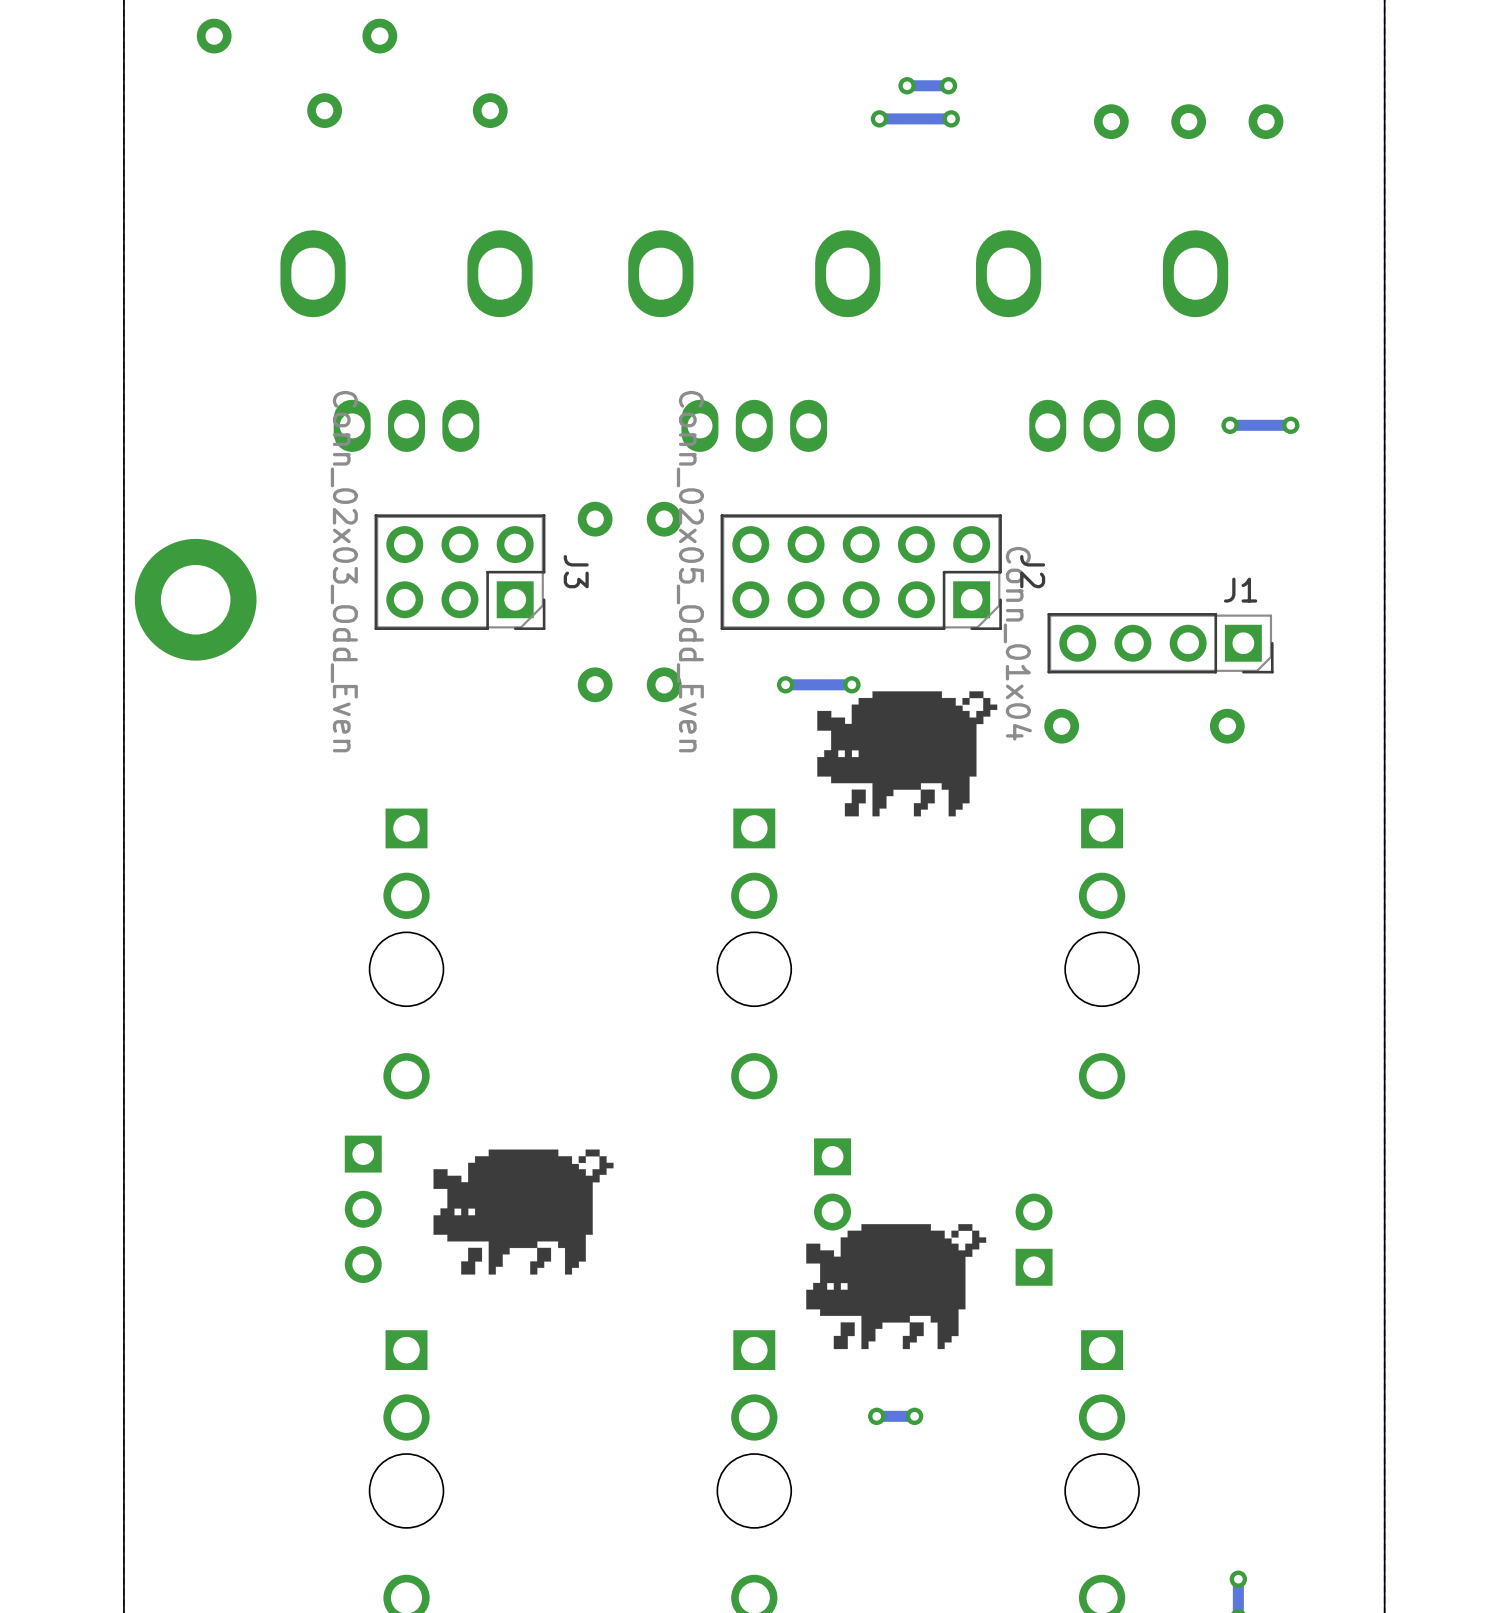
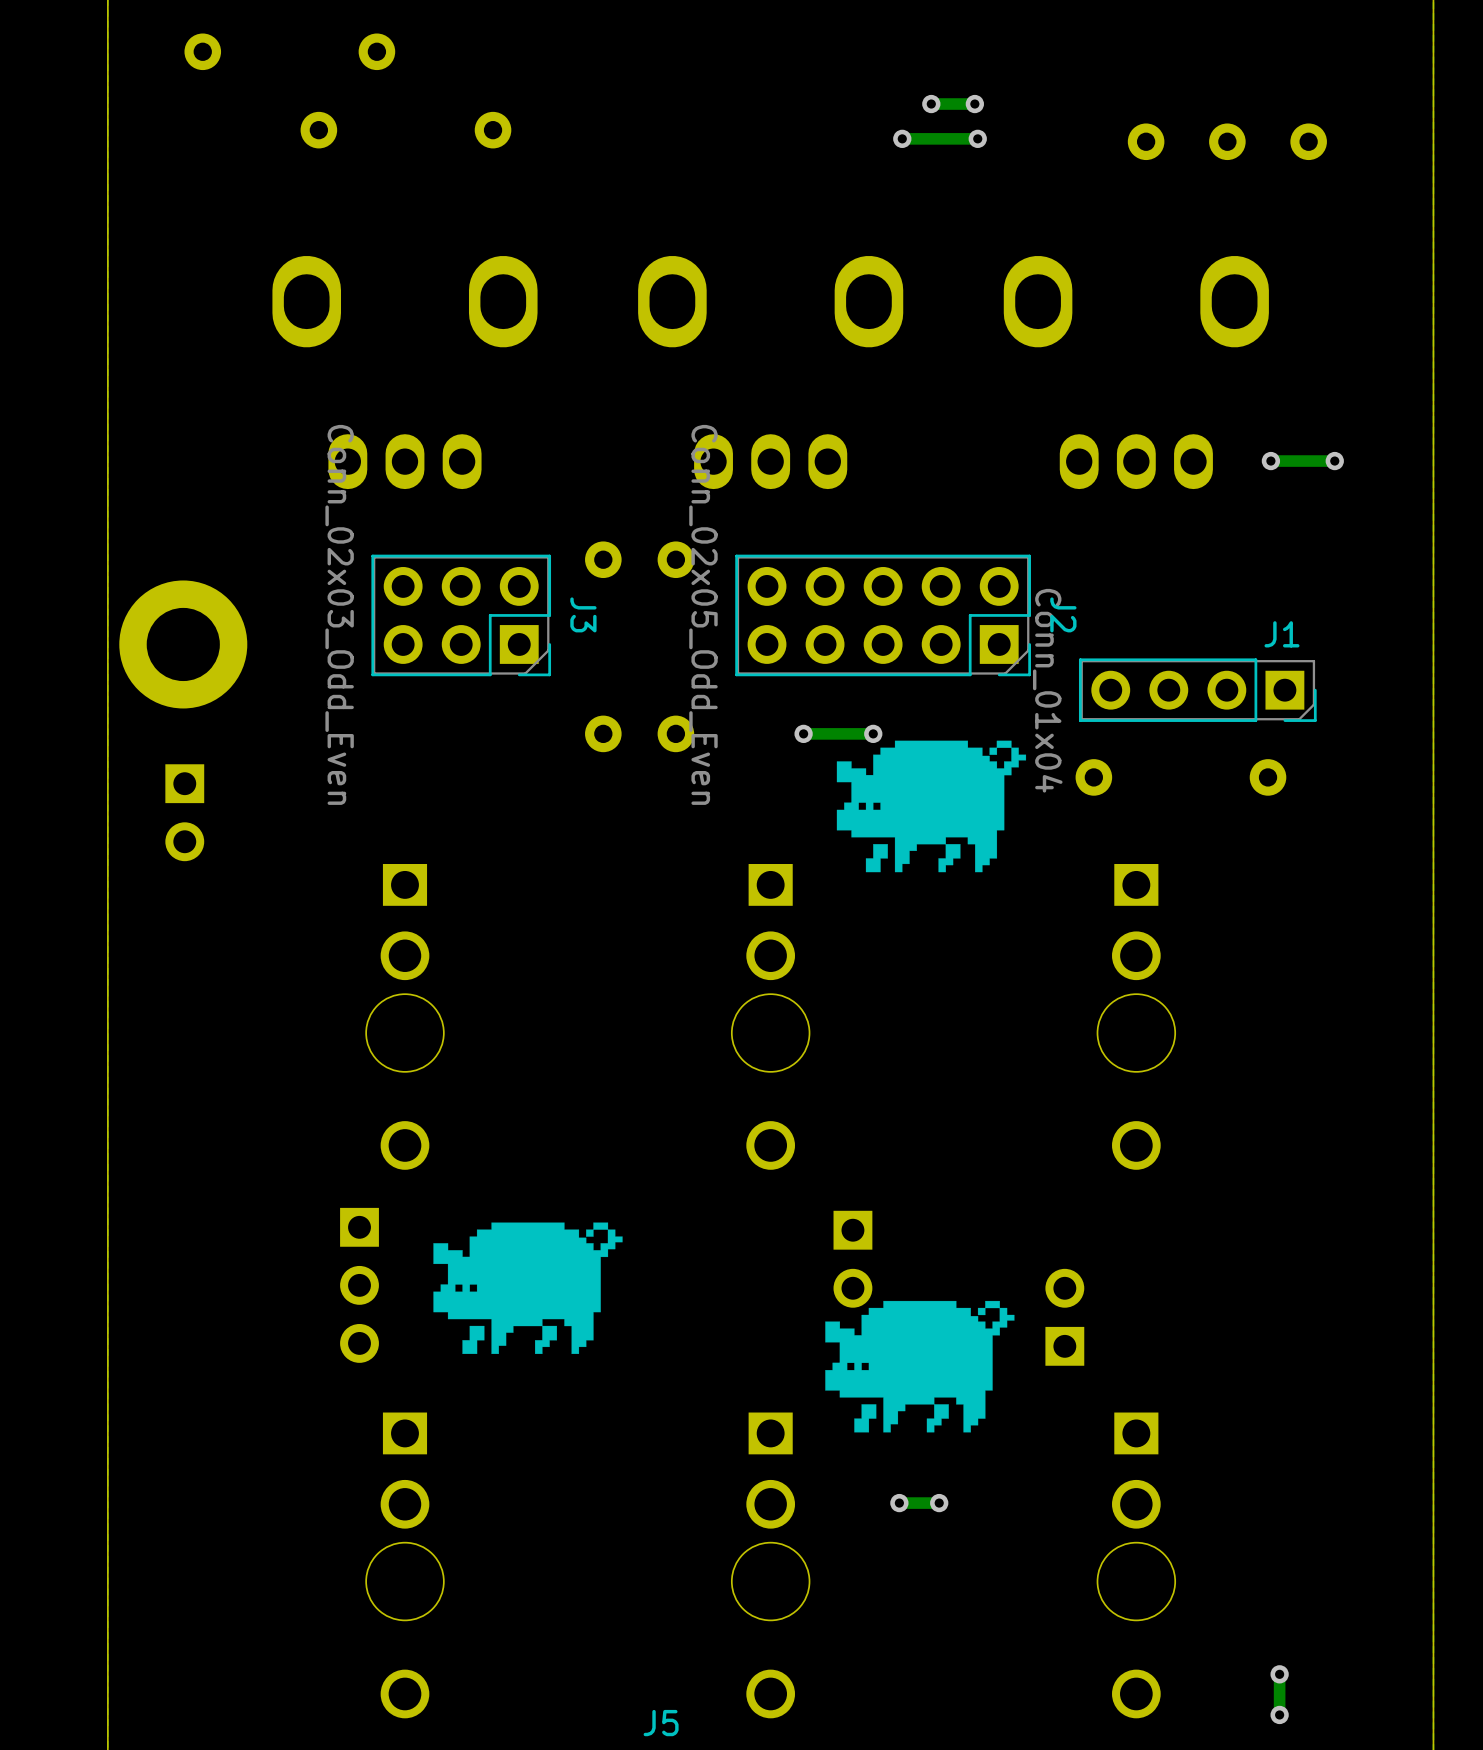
part: none -> (184, 812)

